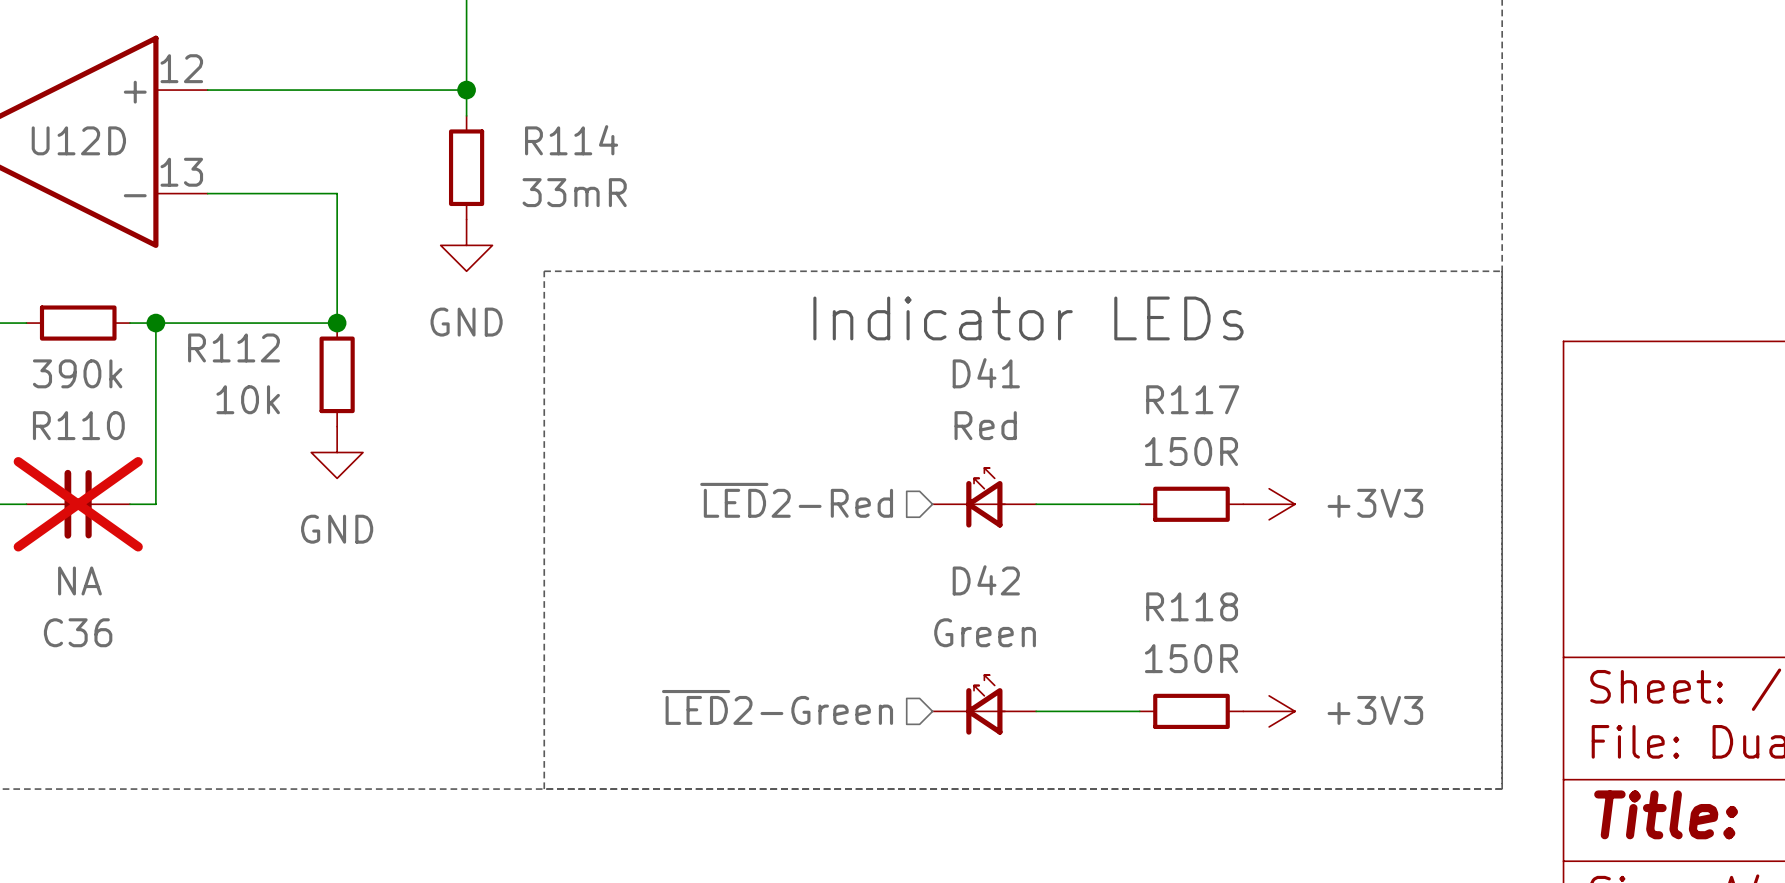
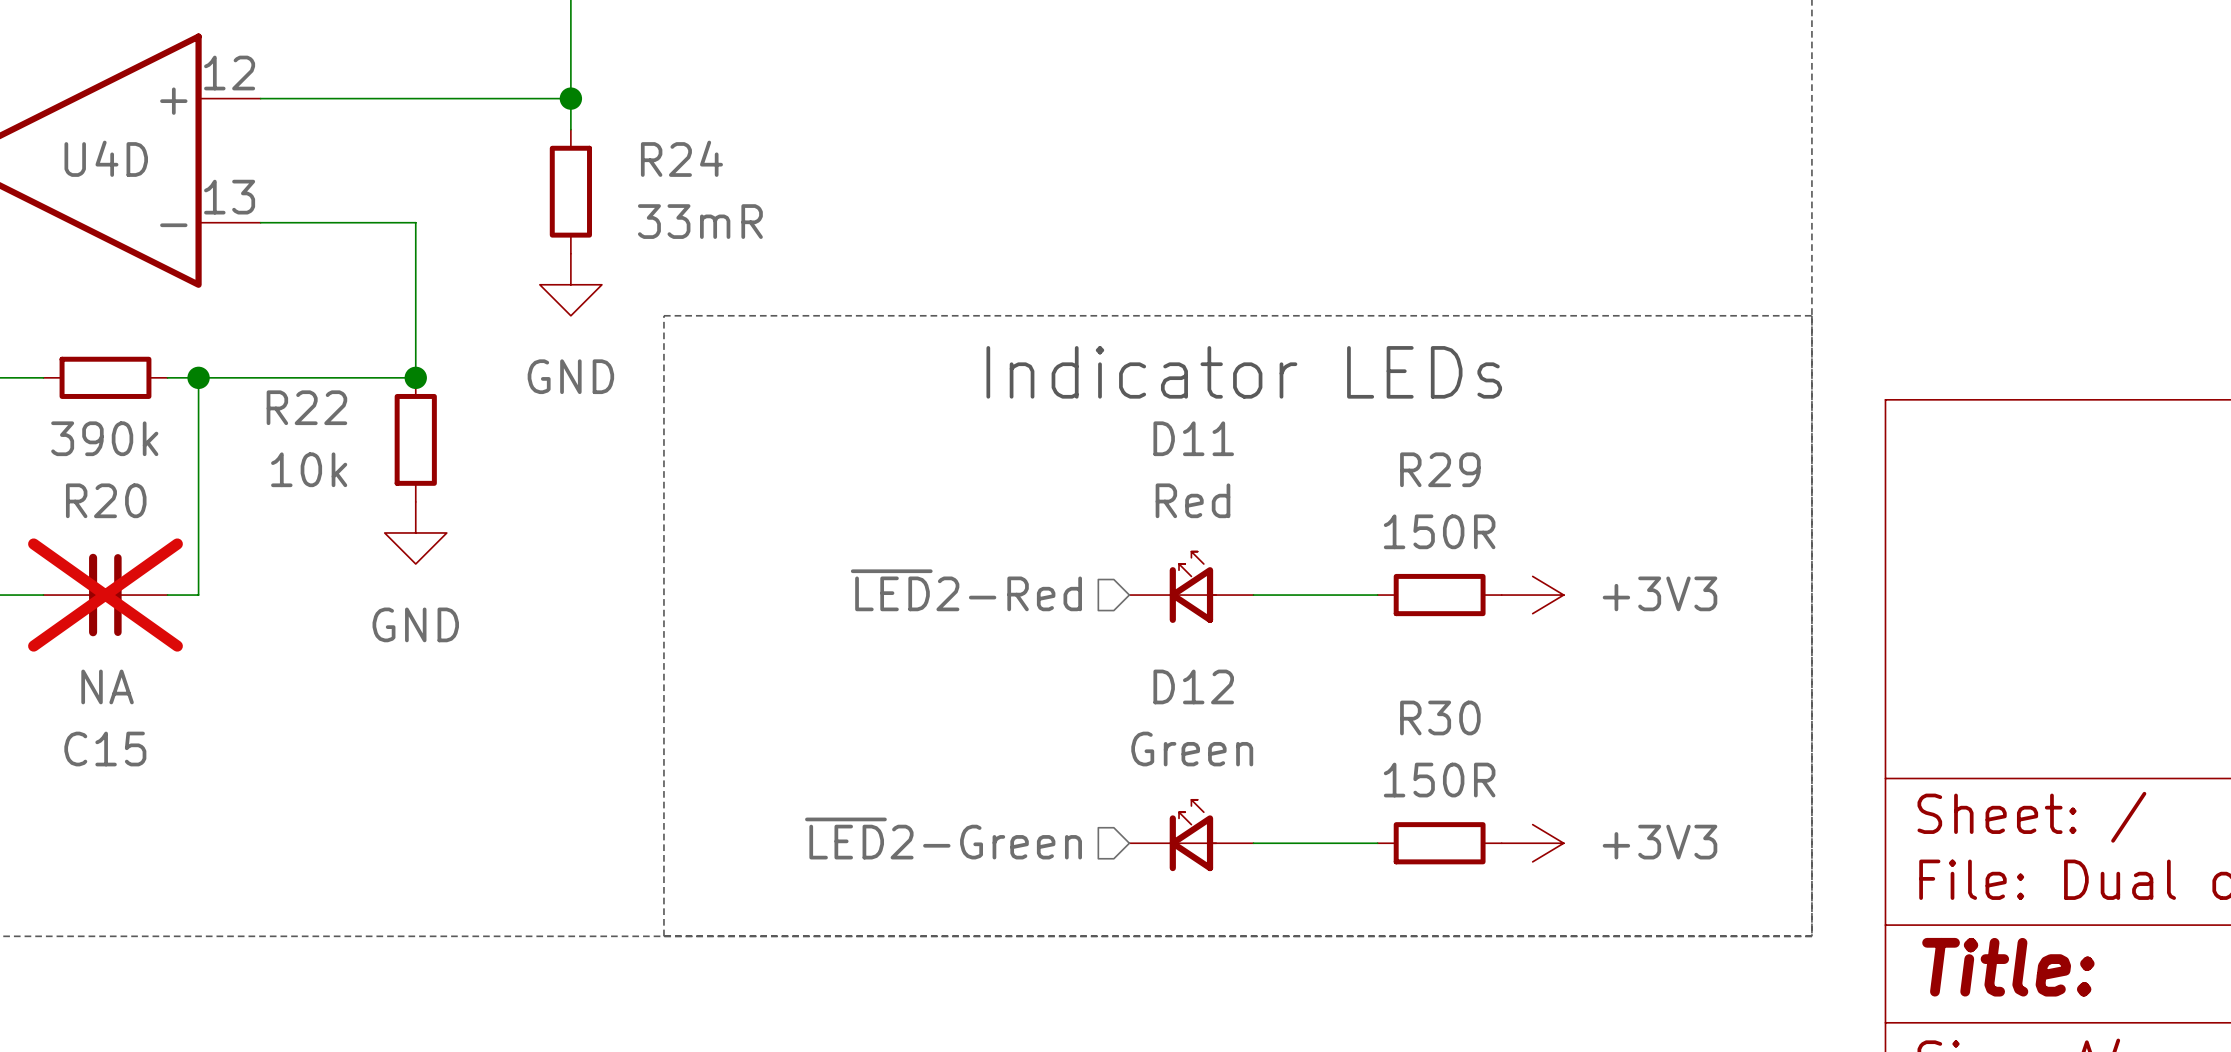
U12D name: U12D (78, 140) -> U4D (106, 158)
R114 name: R114 (571, 140) -> R24 (681, 158)
R112 name: R112 (234, 347) -> R22 (306, 407)
D41 name: D41 (986, 373) -> D11 (1193, 438)
R117 name: R117 (1192, 399) -> R29 (1440, 469)
R110 name: R110 (78, 425) -> R20 (106, 500)
D42 name: D42 (986, 580) -> D12 (1193, 686)
R118 name: R118 (1192, 606) -> R30 (1440, 717)
C36 name: C36 (78, 632) -> C15 (105, 749)

